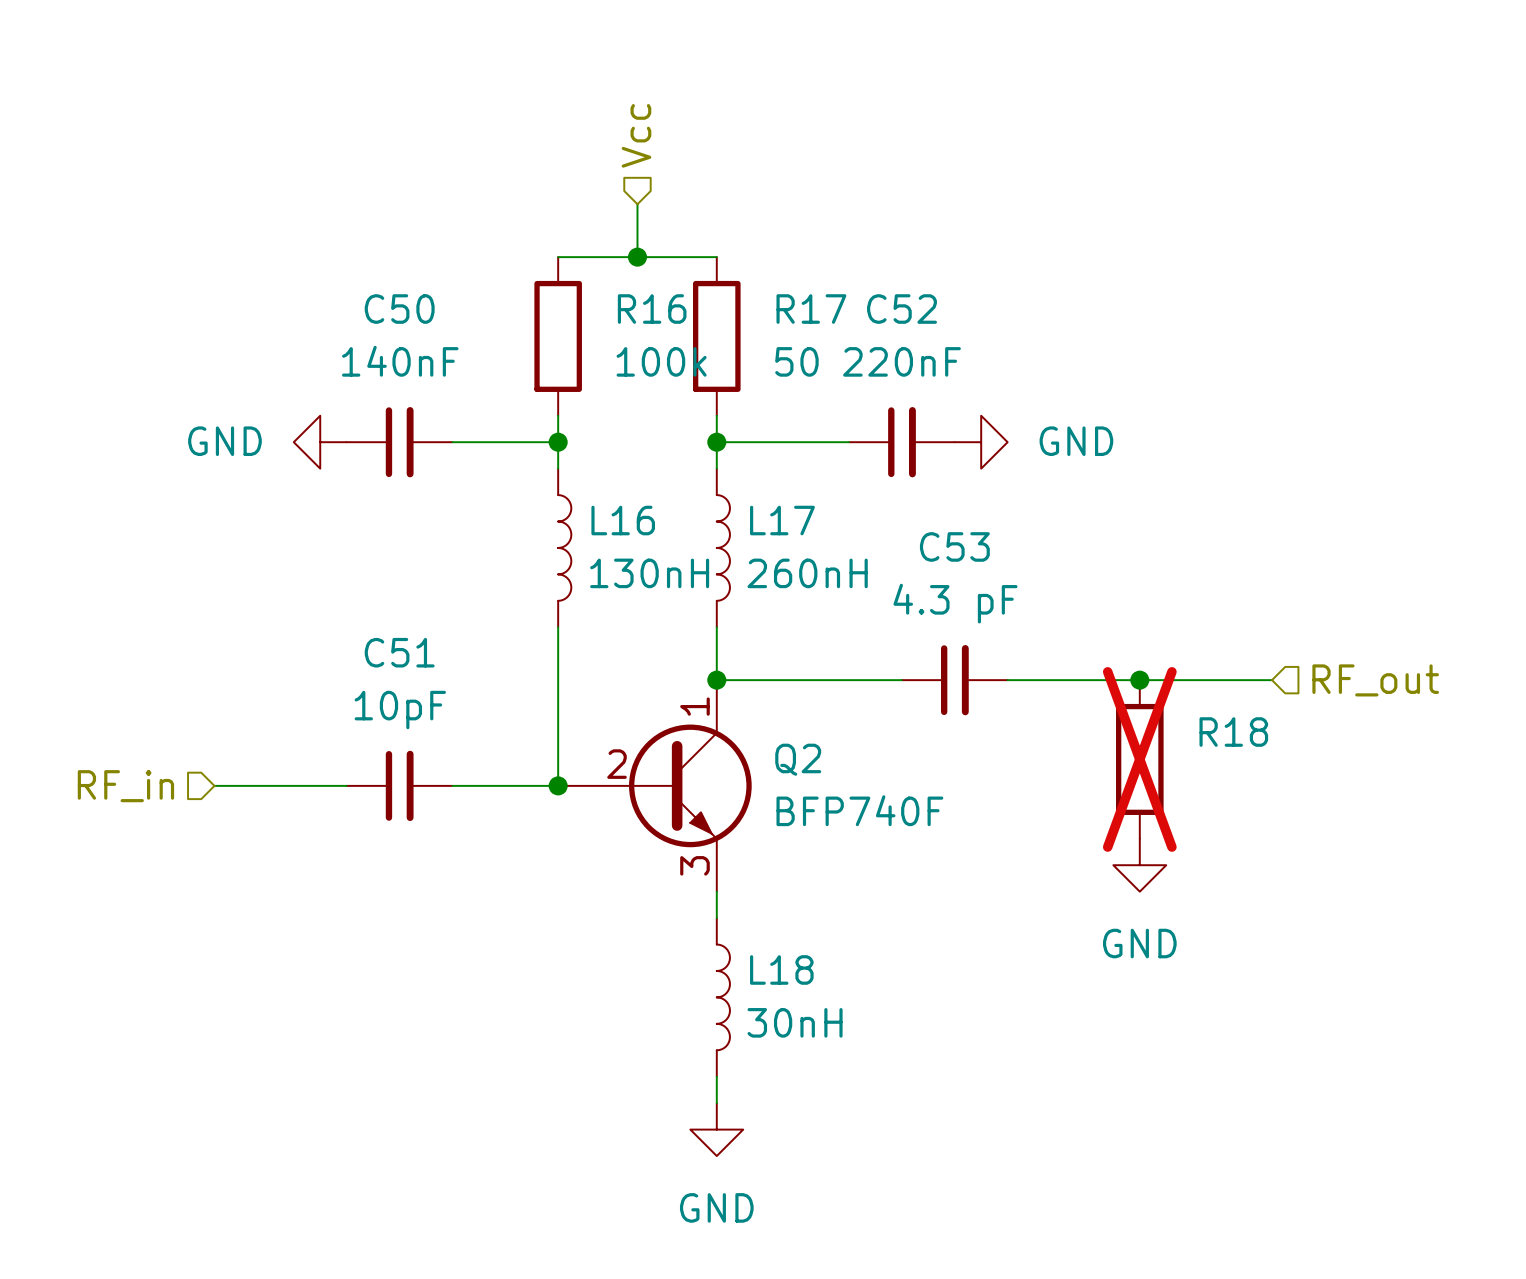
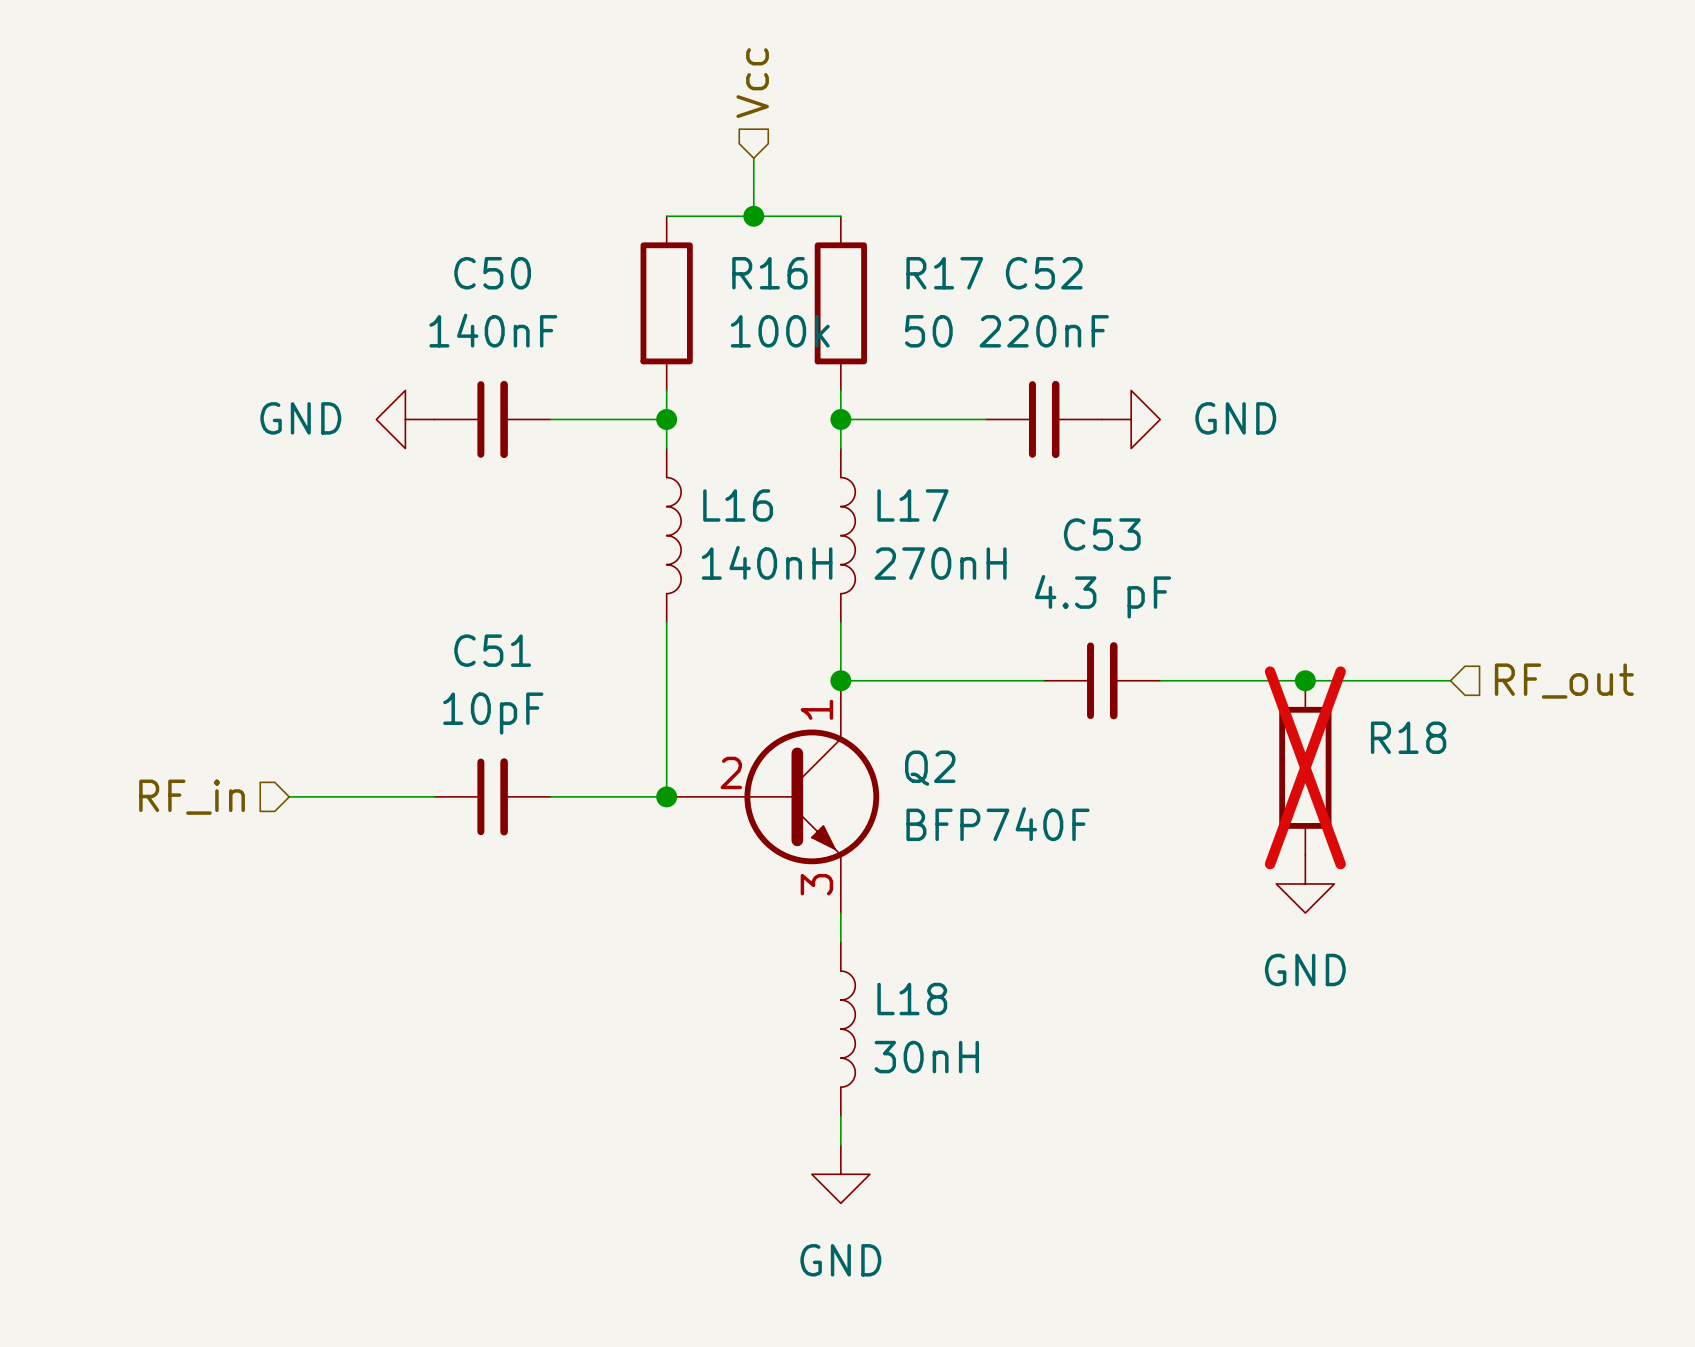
L16 value: 130nH (649, 573) -> 140nH (767, 562)
L17 value: 260nH (807, 573) -> 270nH (940, 563)

